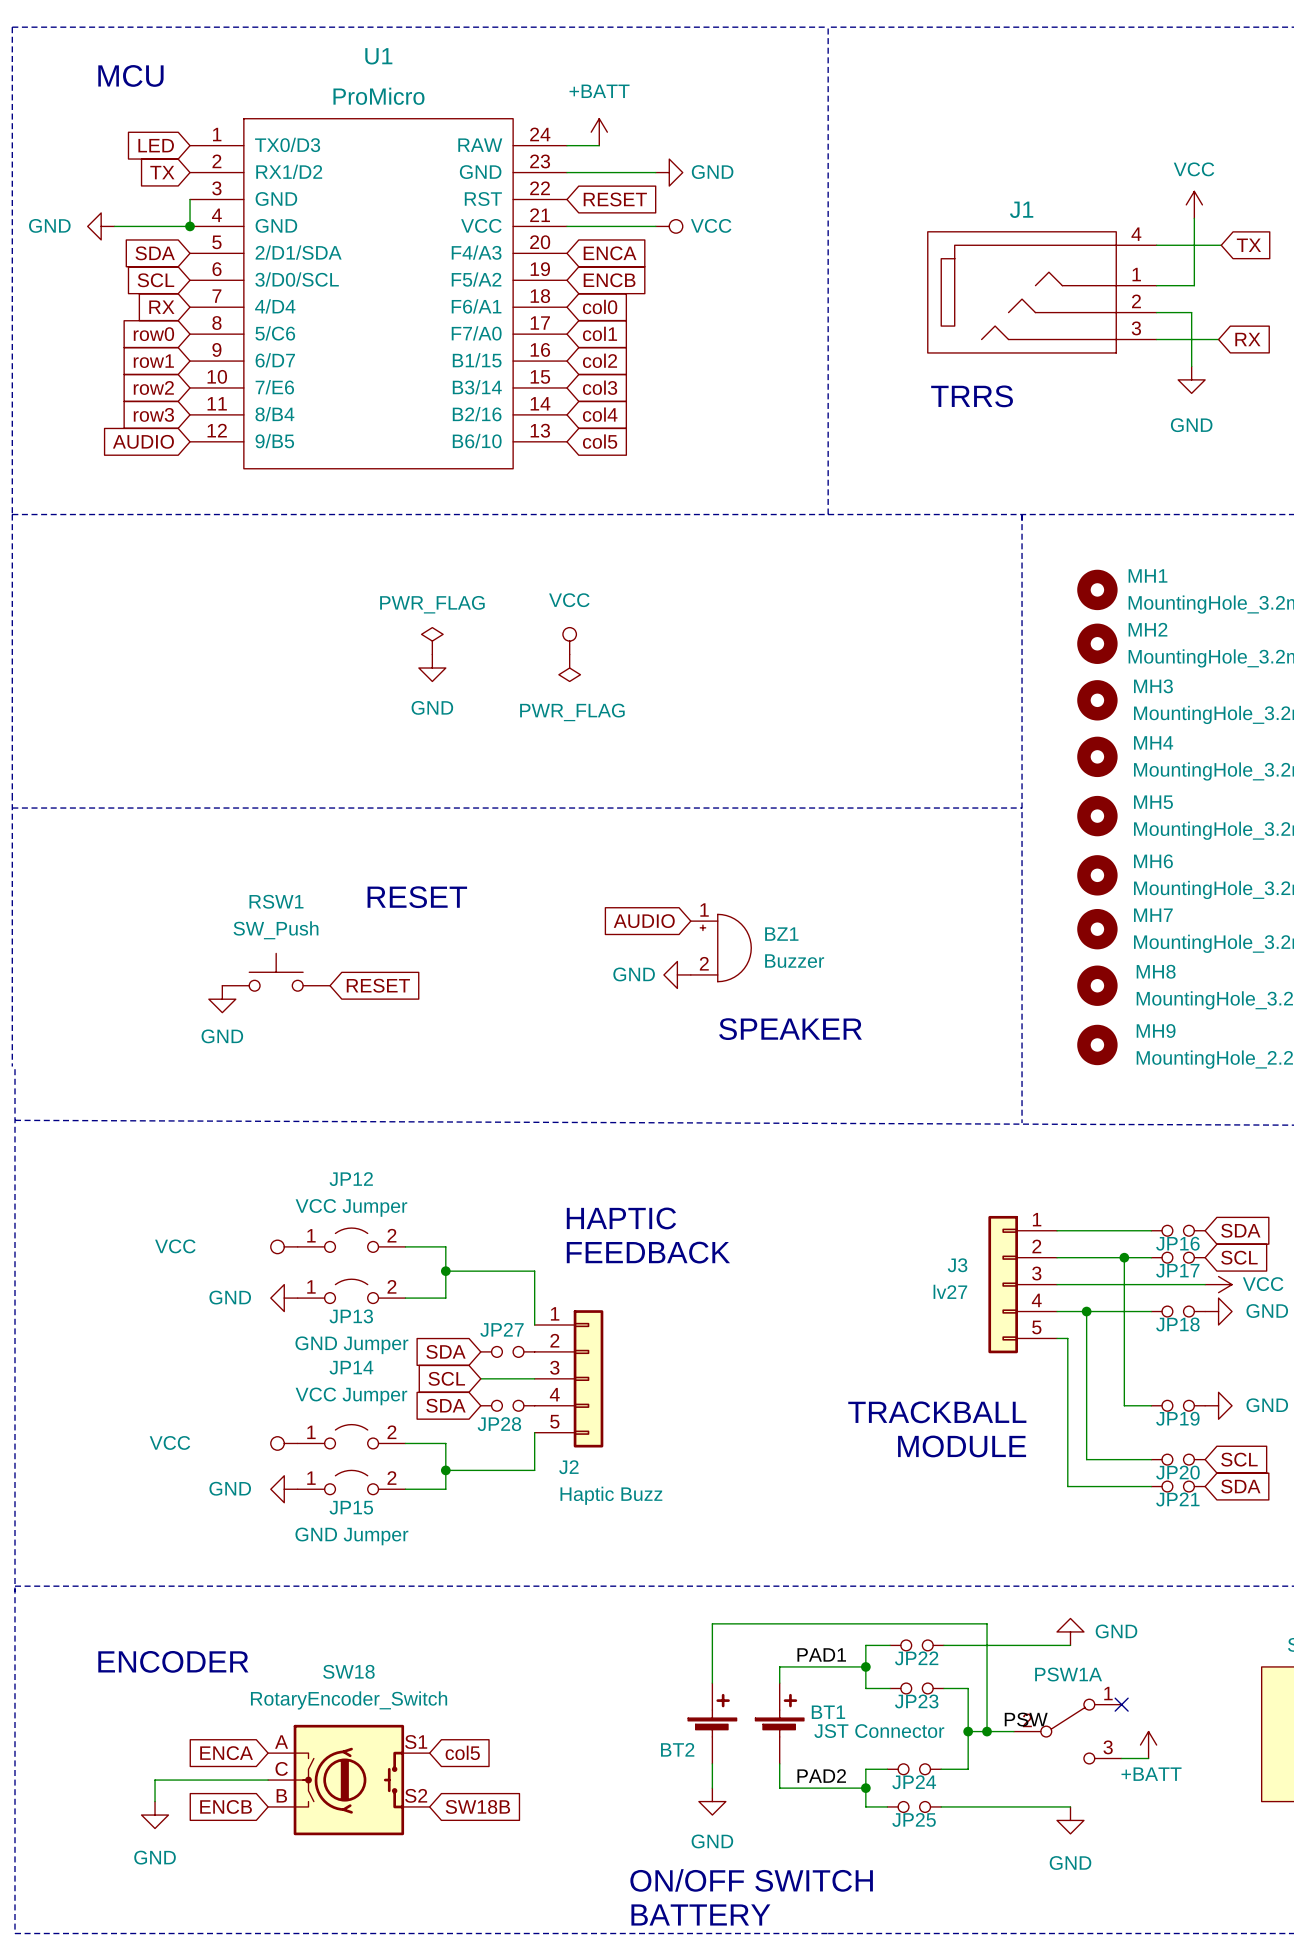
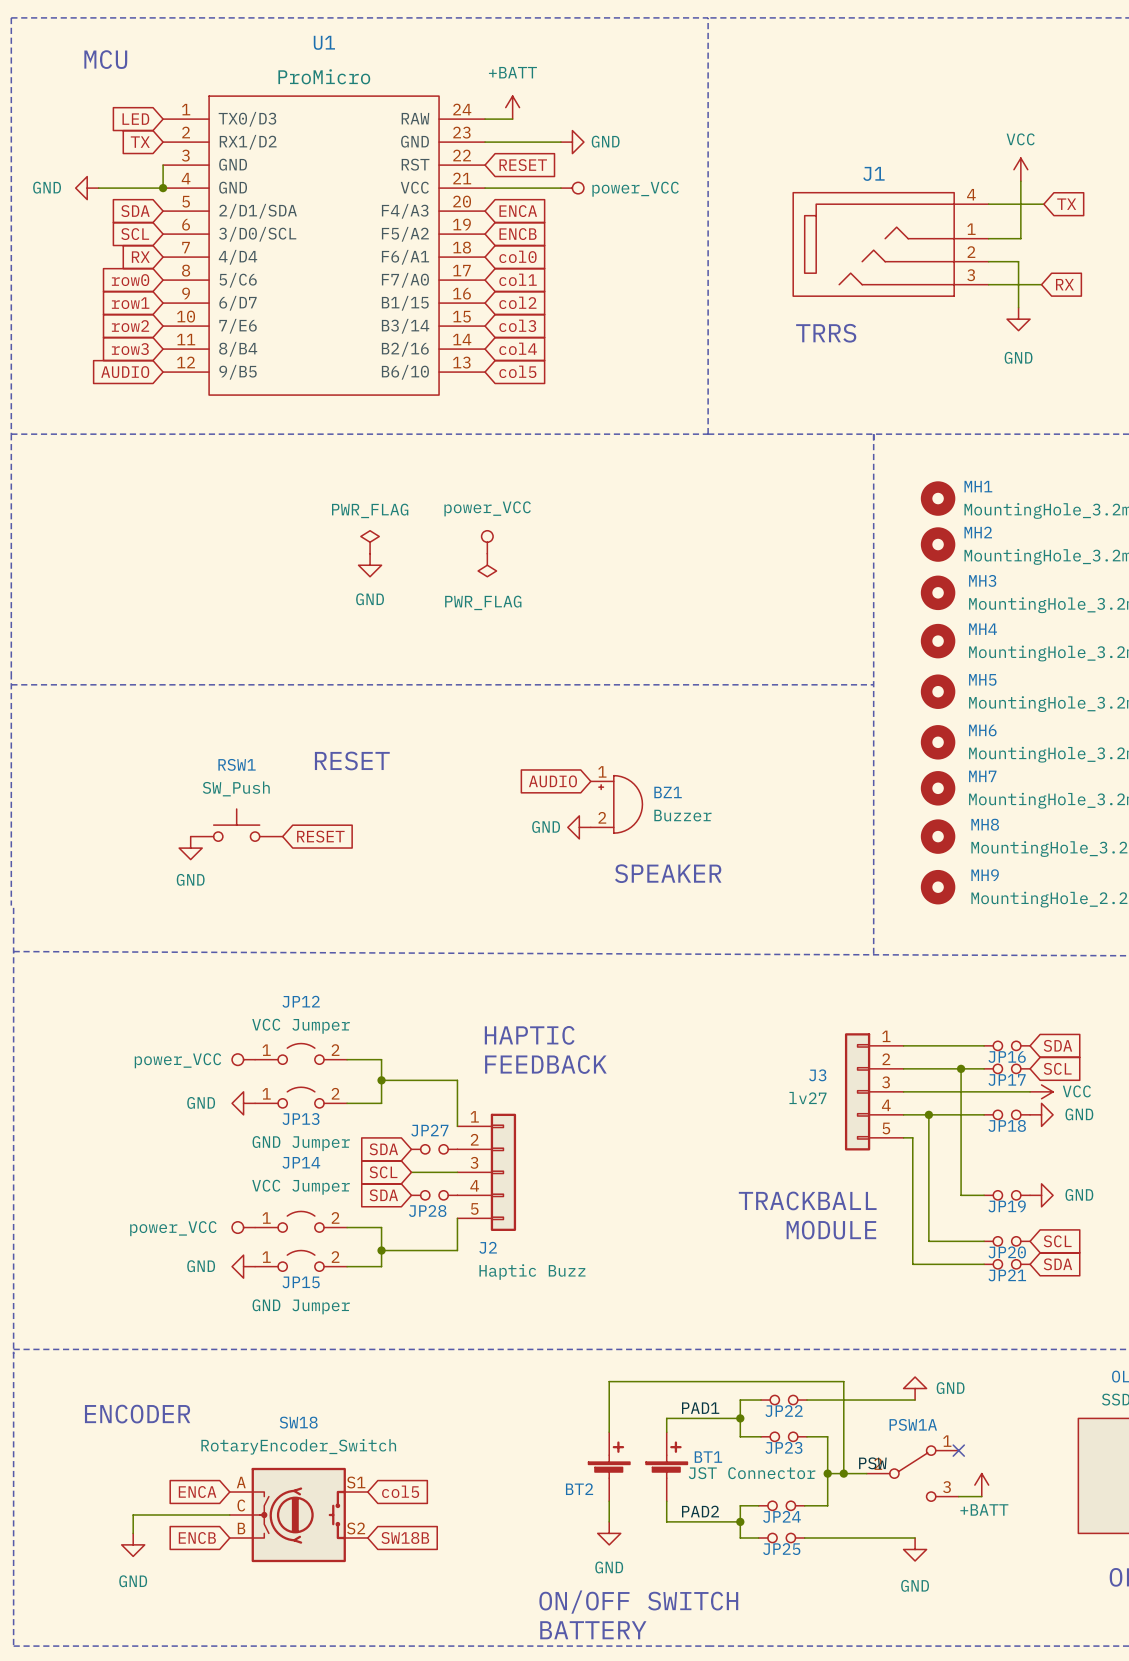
power symbol: VCC (669, 226) -> power_VCC (572, 188)
power symbol: VCC (569, 641) -> power_VCC (487, 542)
power symbol: VCC (284, 1246) -> power_VCC (243, 1059)
power symbol: VCC (284, 1443) -> power_VCC (243, 1227)

